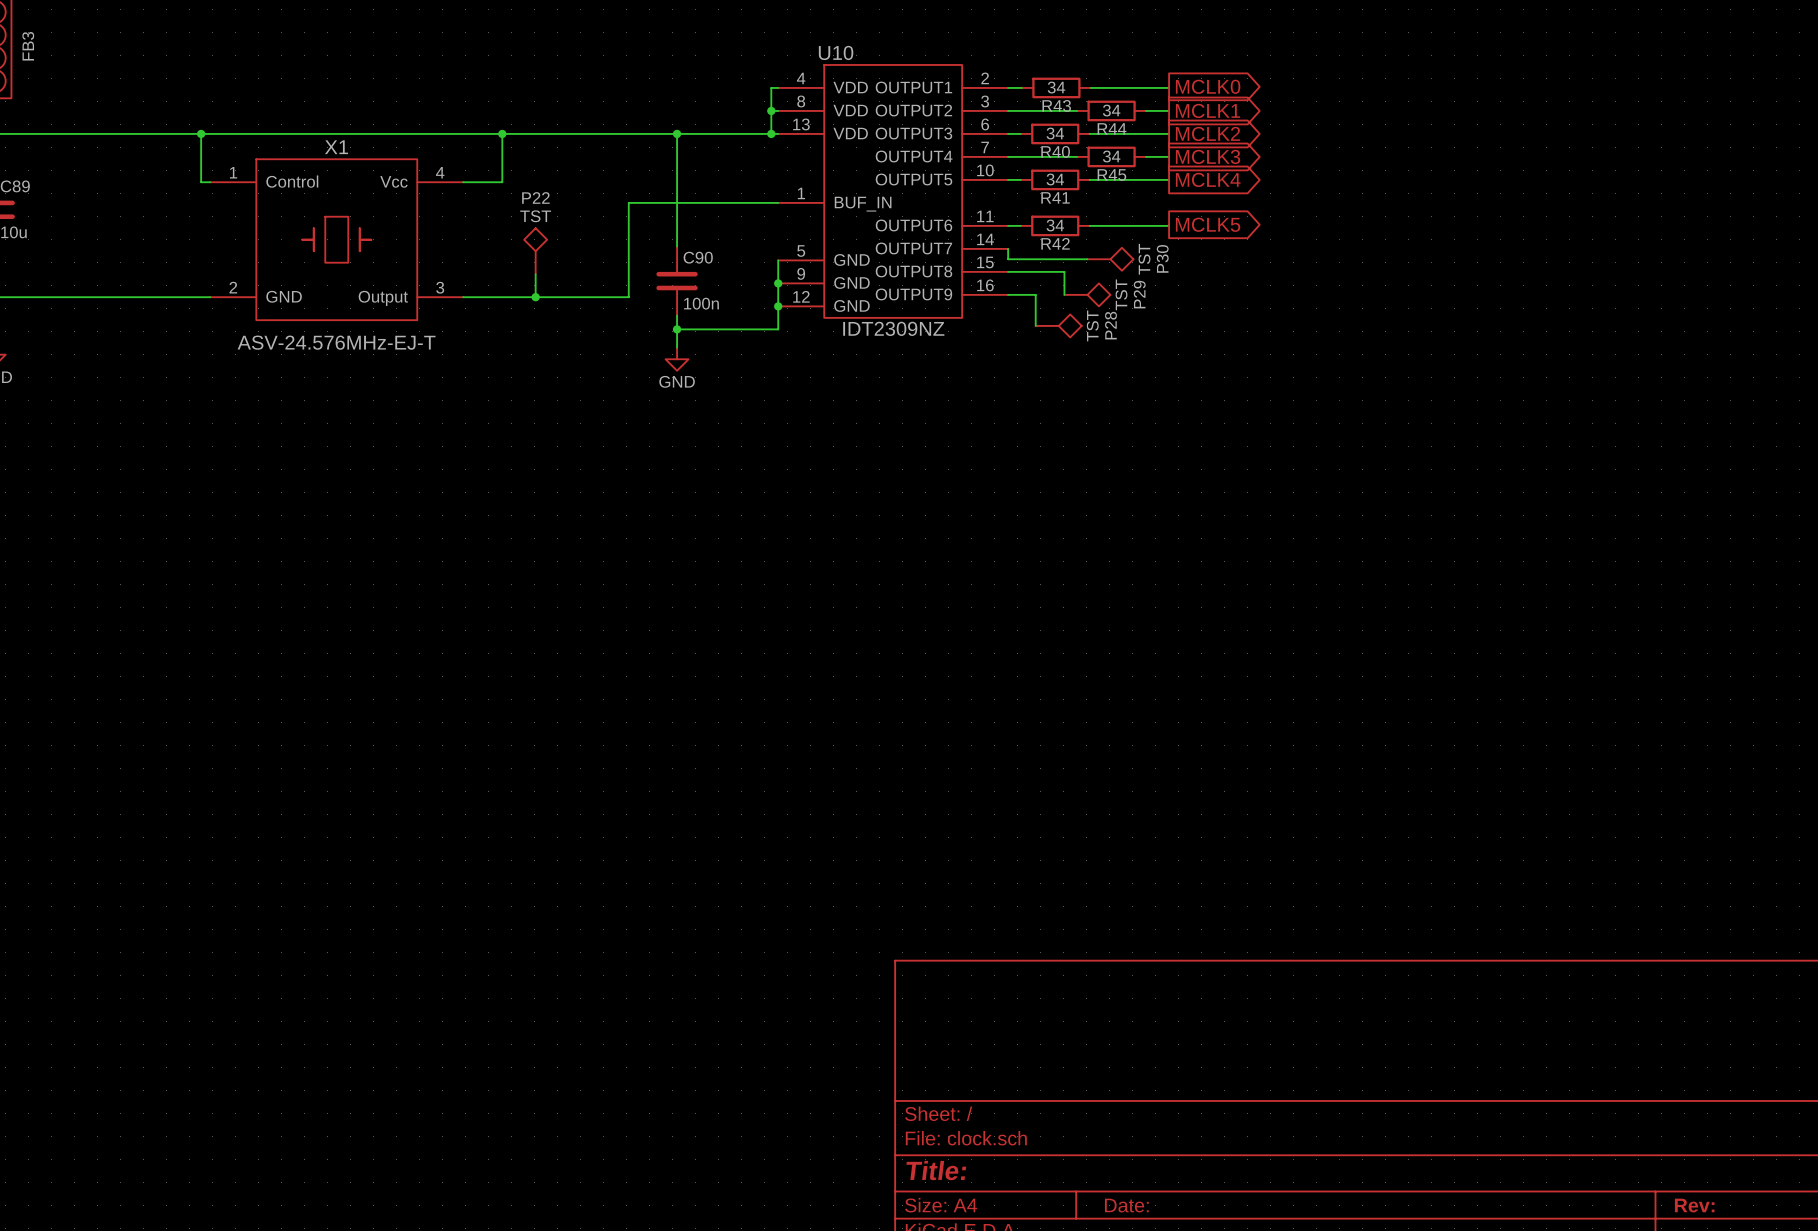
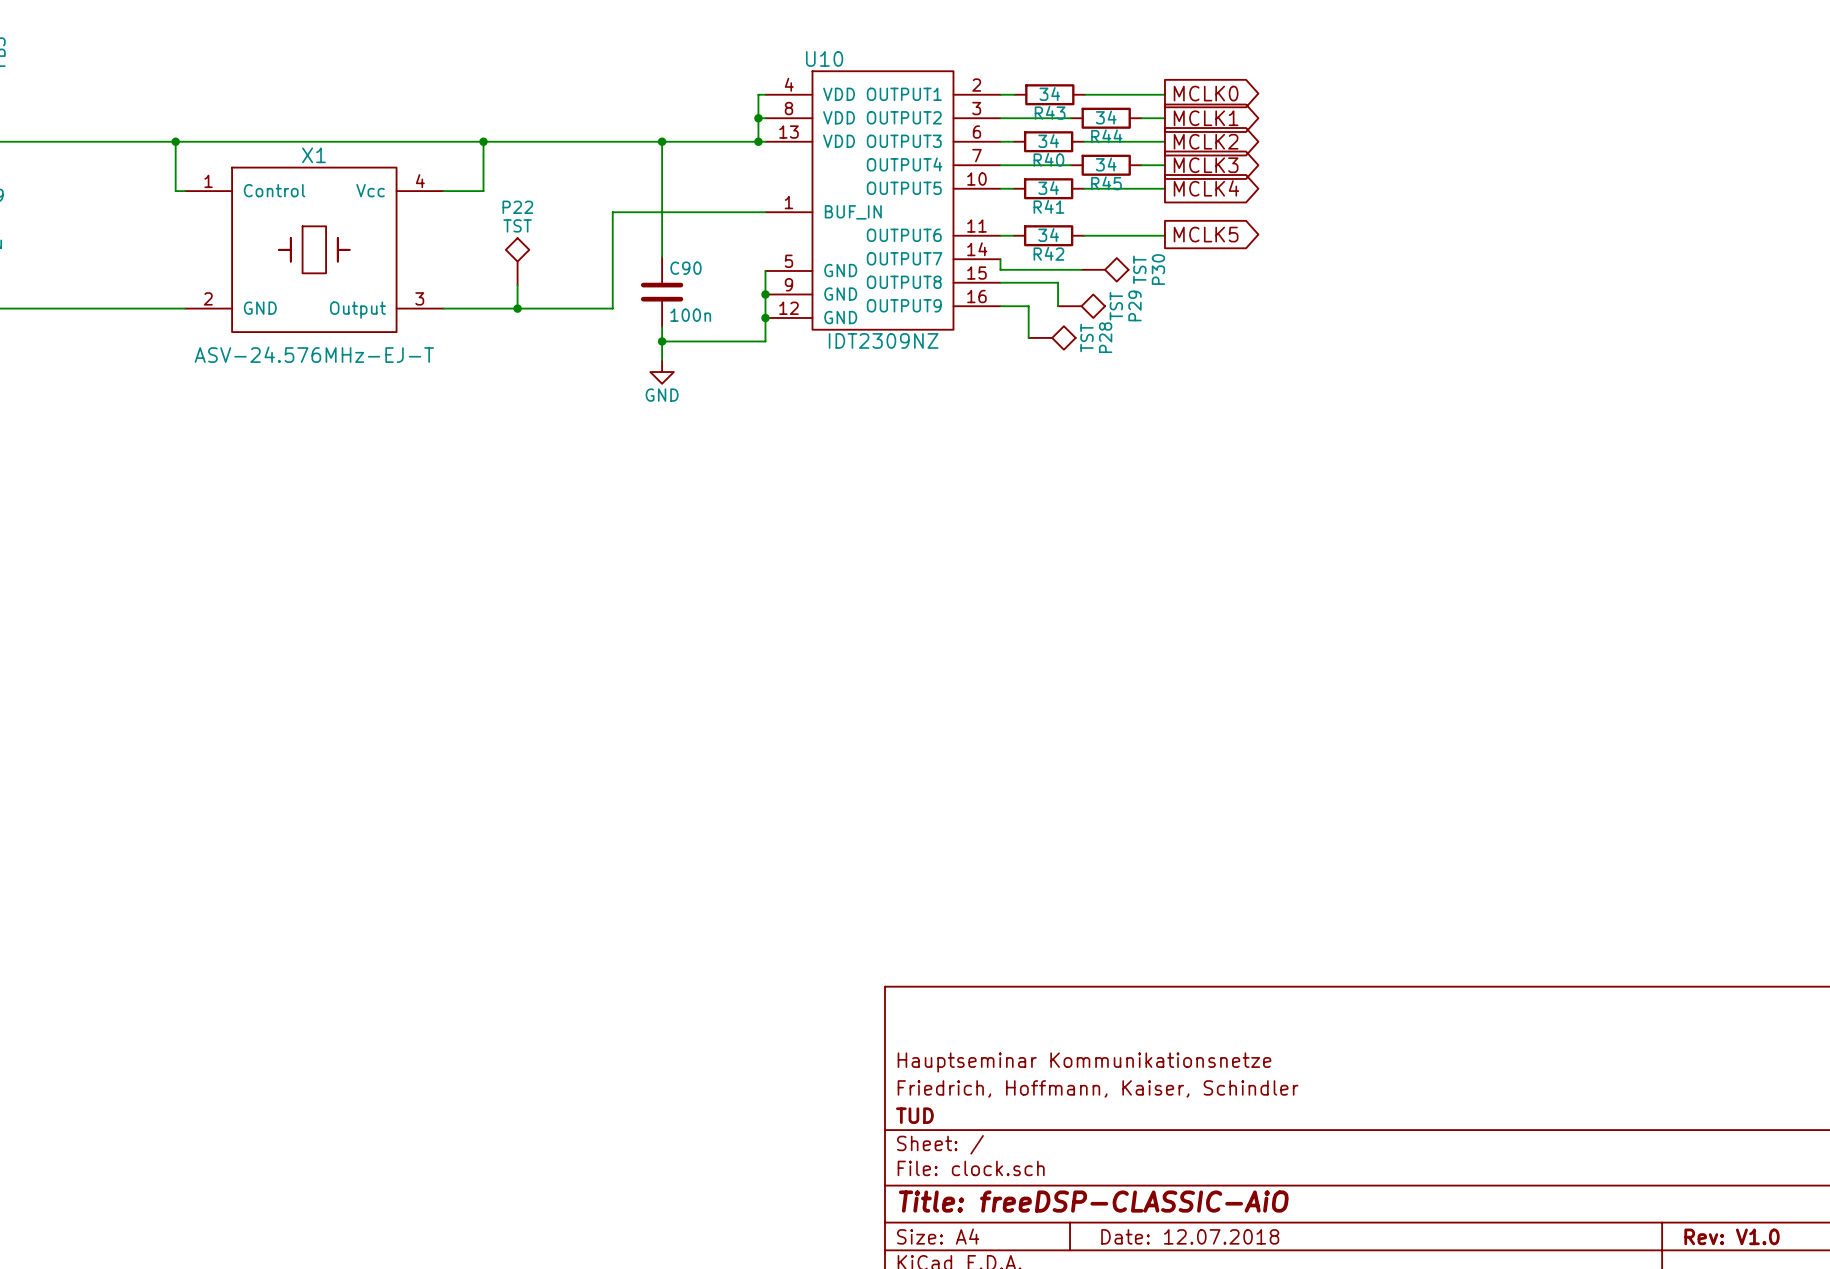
title block: none -> Hauptseminar Kommunikationsnetze (1084, 1062)
title block: none -> Friedrich, Hoffmann, Kaiser, Schindler (1098, 1088)
title block: none -> TUD (914, 1115)
title block: Title: (936, 1170) -> Title: freeDSP-CLASSIC-AiO (1093, 1201)
title block: Date: (1126, 1205) -> Date: 12.07.2018 (1190, 1236)
title block: Rev: (1694, 1205) -> Rev: V1.0 (1732, 1236)

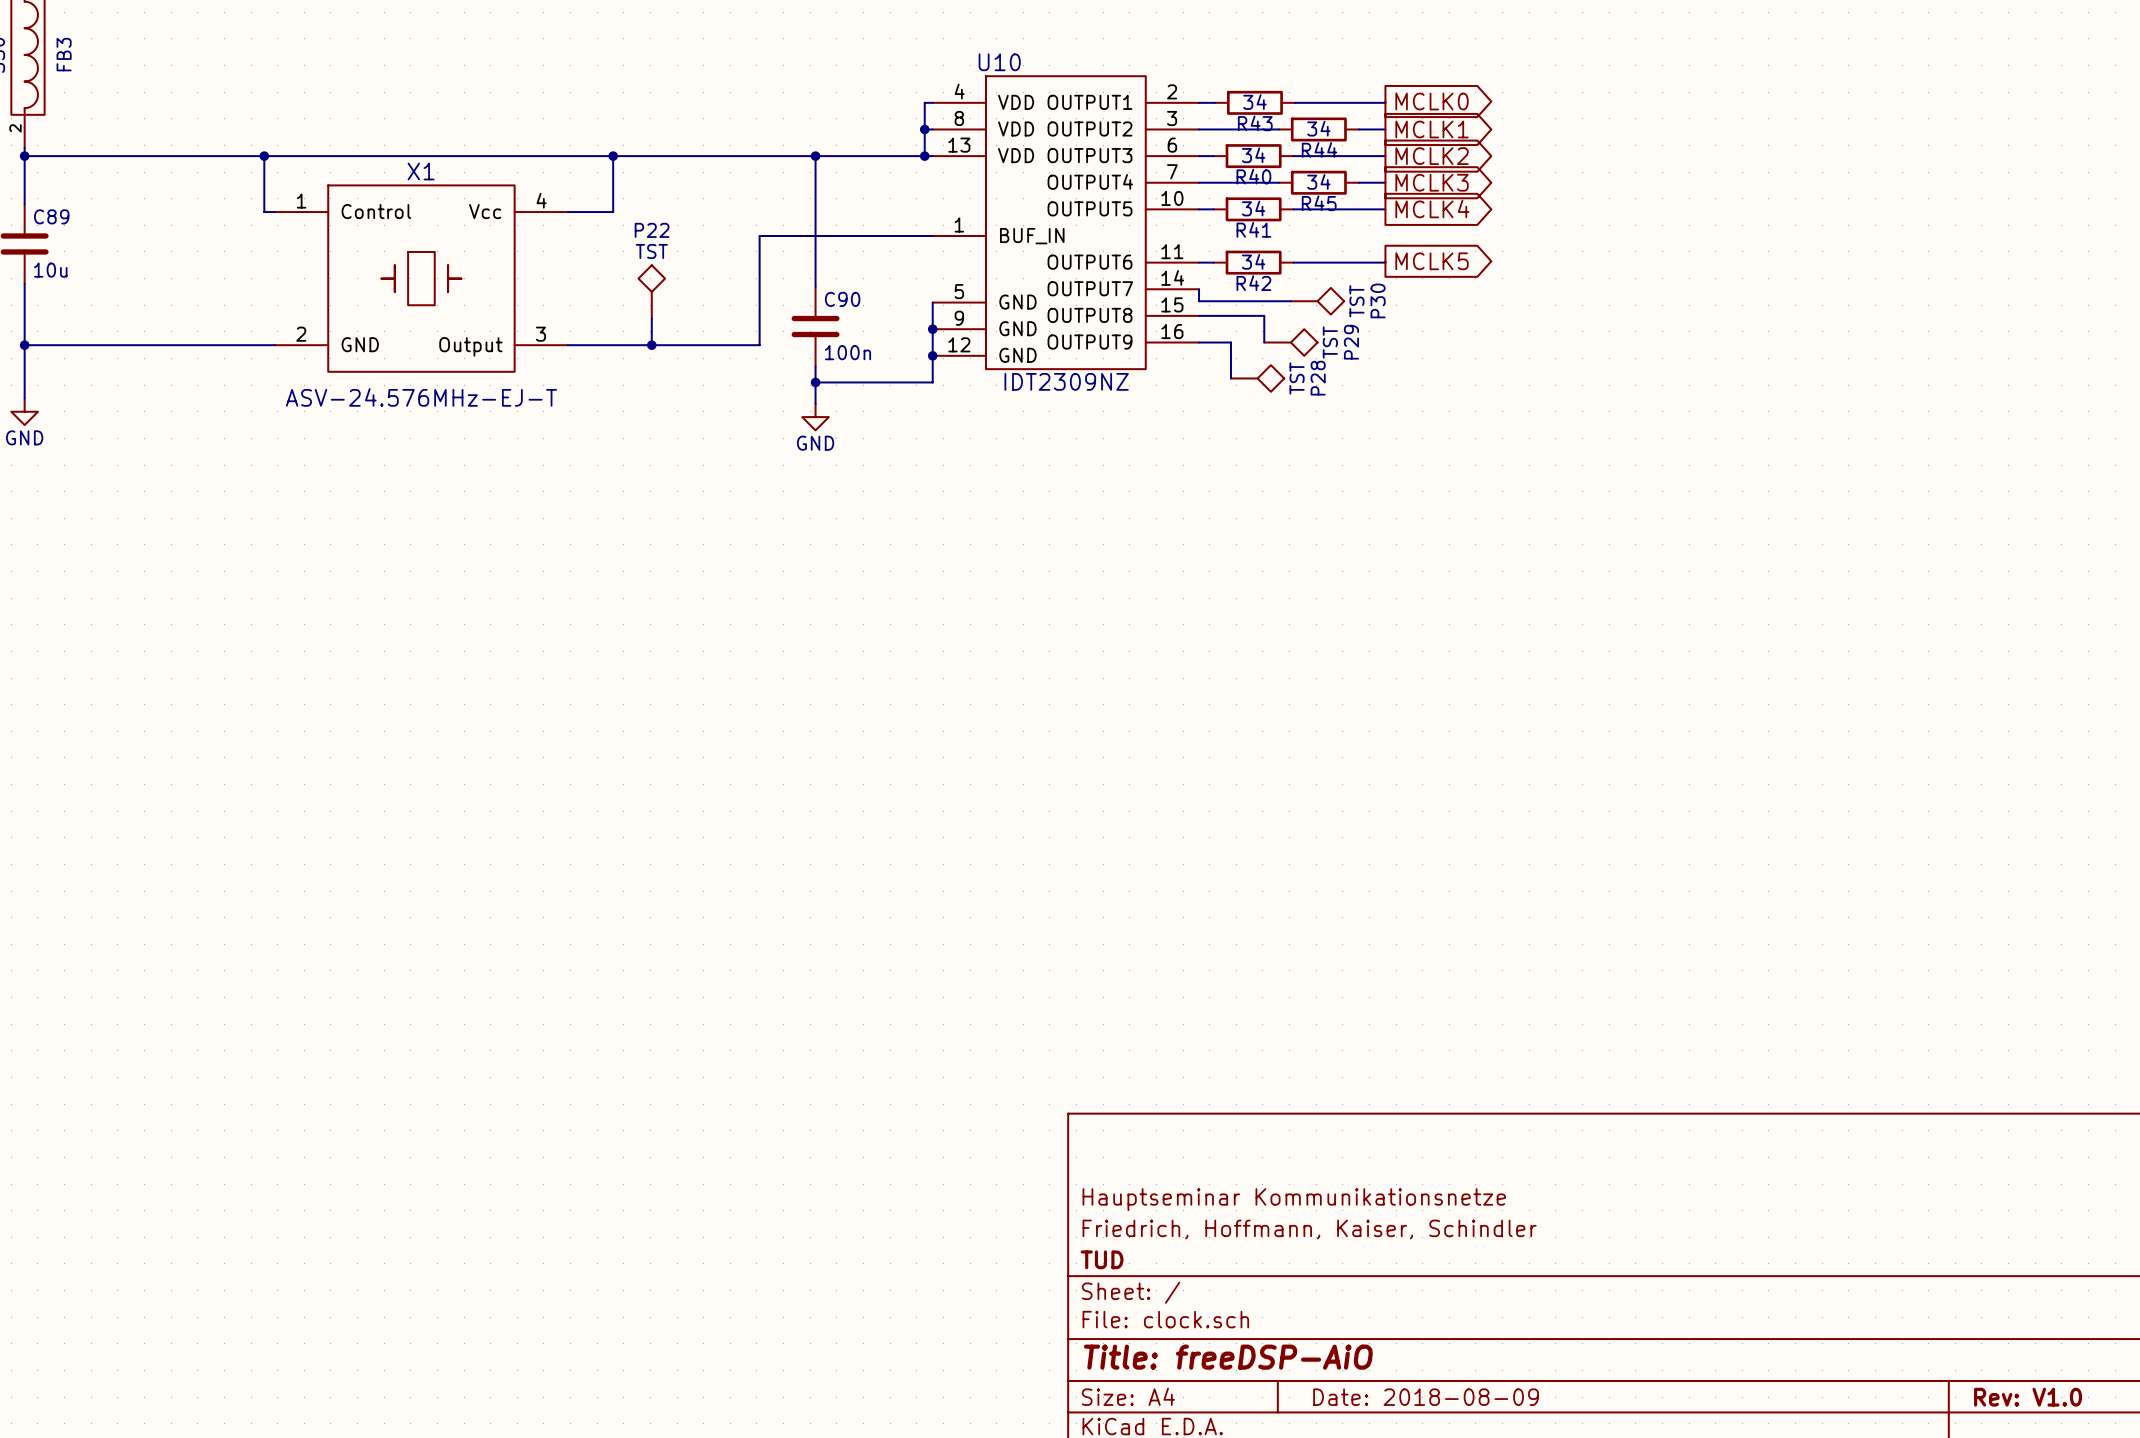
title block: Title: freeDSP-CLASSIC-AiO (1093, 1201) -> Title: freeDSP-AiO (1228, 1357)
title block: Date: 12.07.2018 (1190, 1236) -> Date: 2018-08-09 (1426, 1397)

